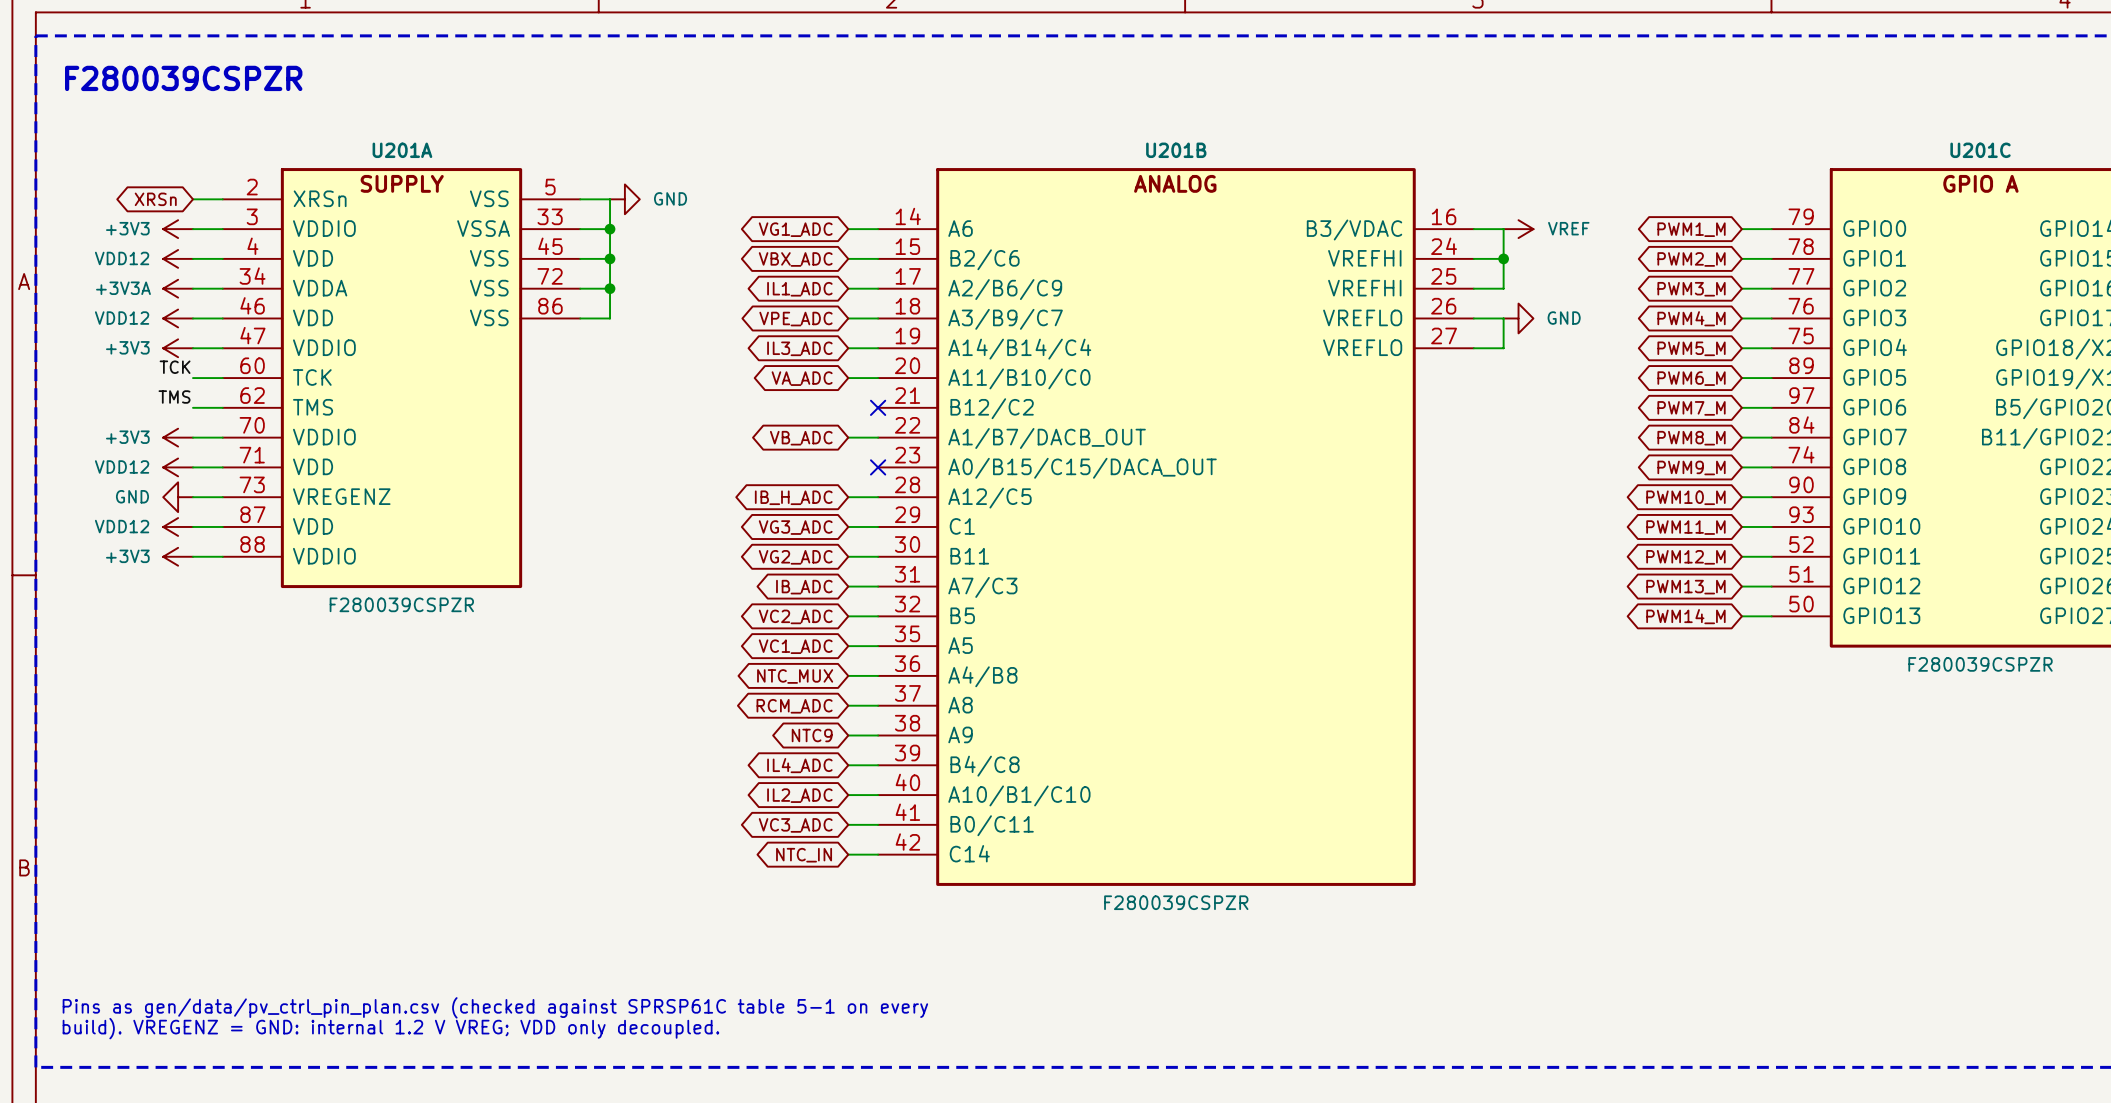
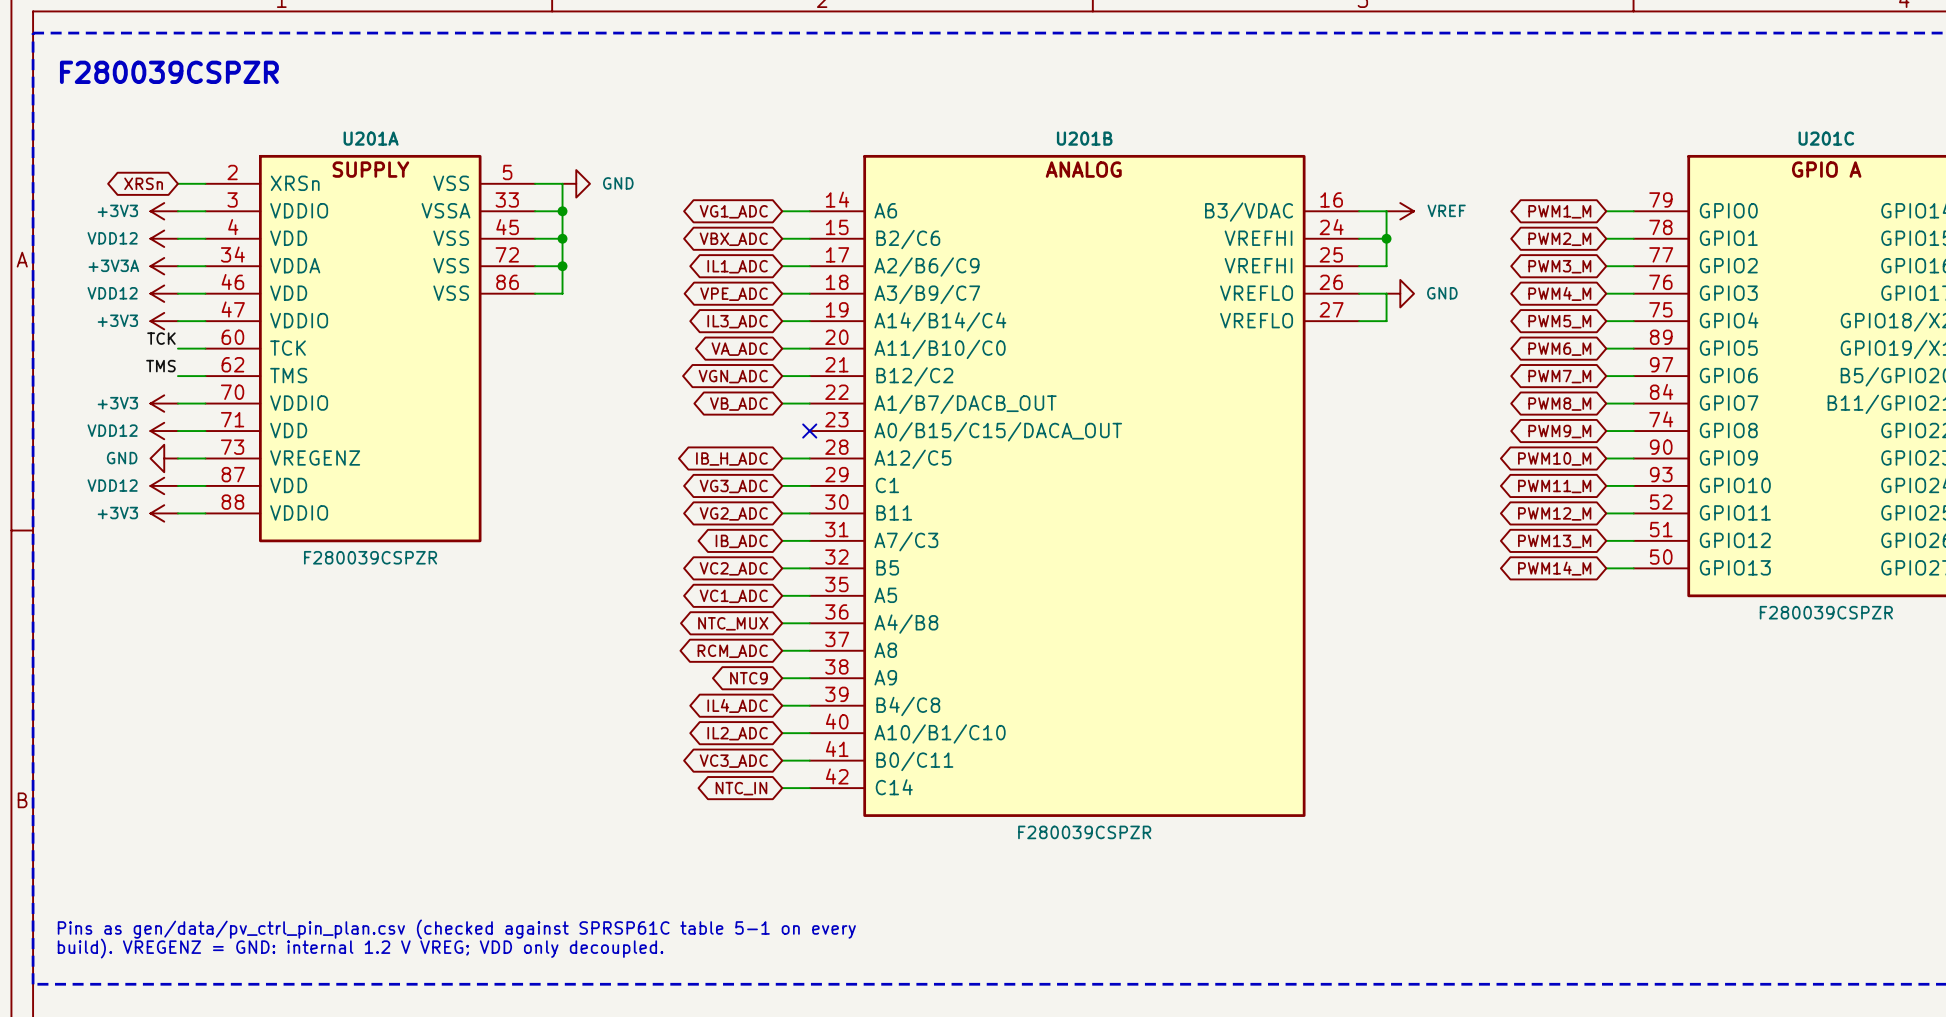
wire: none -> (782, 376) (809, 376)
no-connect mark: (878, 407) -> none
global label: none -> VGN_ADC (733, 376)

